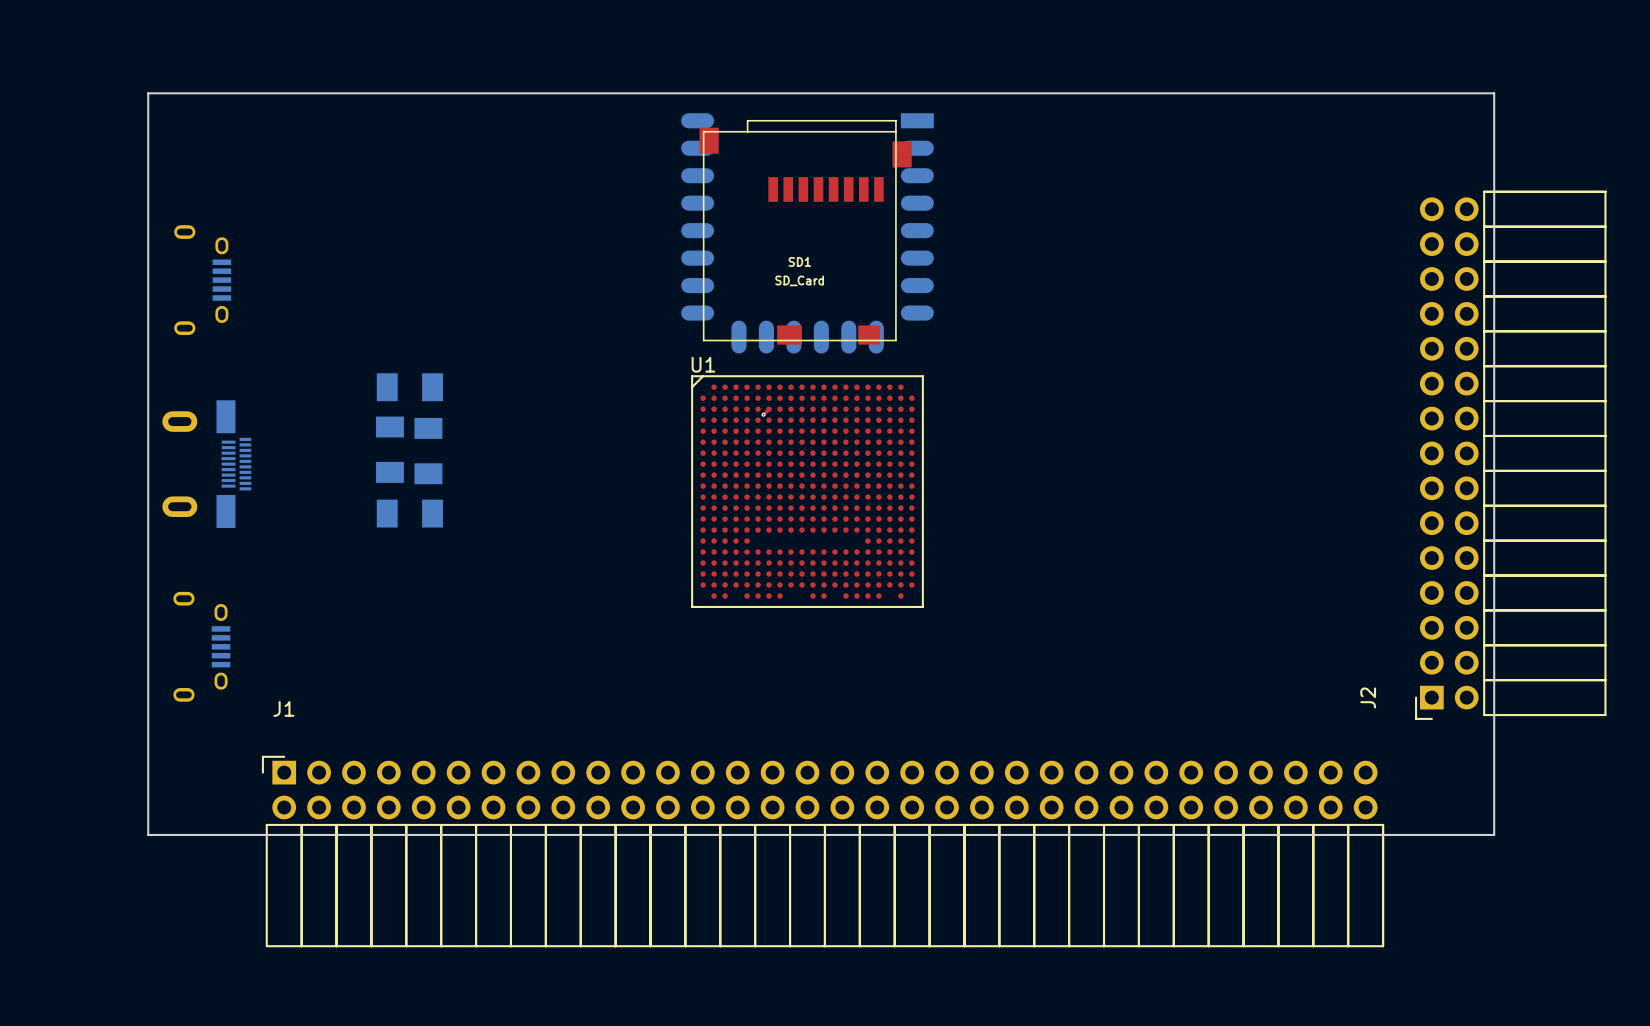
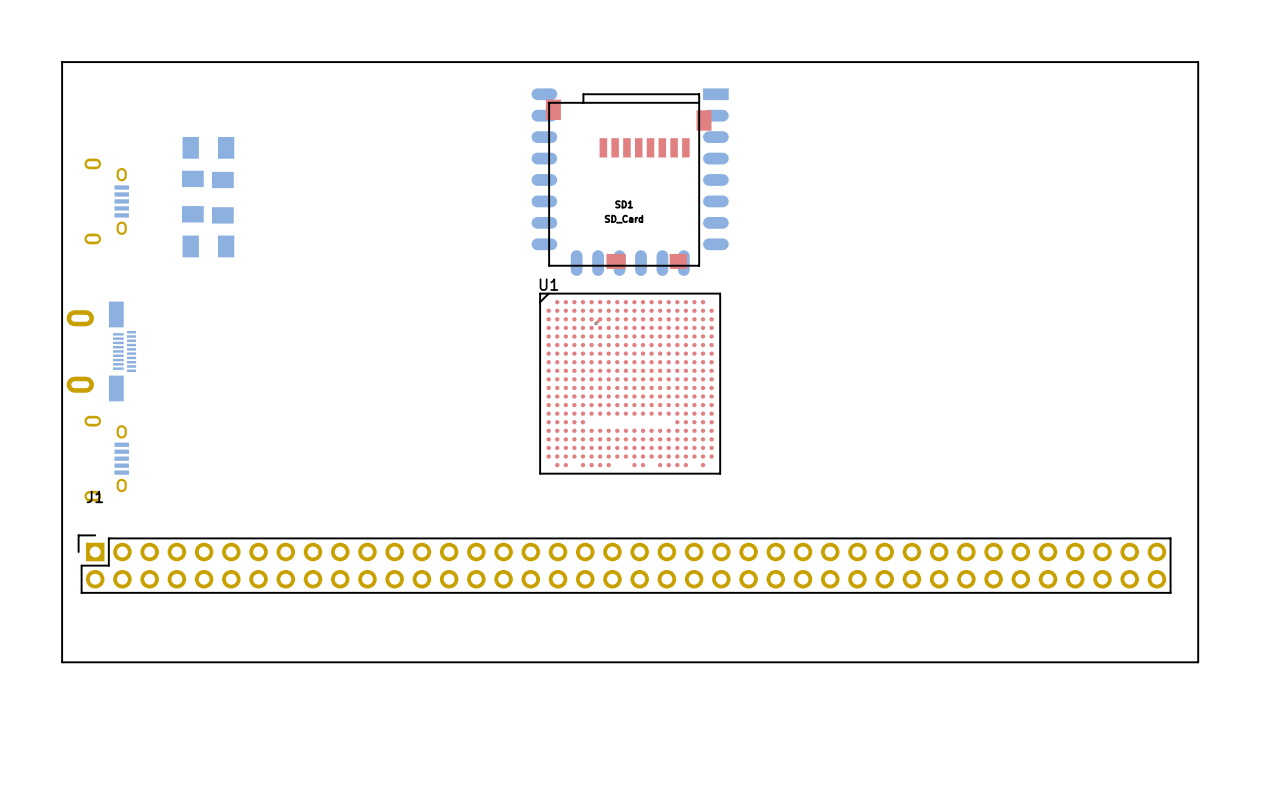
board edge: (148, 93) (148, 834) (1494, 834) (1494, 93) (148, 93) -> (62, 62) (62, 662) (1198, 662) (1198, 62) (62, 62)
part: none -> (208, 147)
part: none -> (192, 196)
part: none -> (222, 197)
part: none -> (106, 201)
part: (202, 280) -> none
part: none -> (208, 246)
part: (409, 387) -> none
part: (389, 449) -> none
part: (428, 451) -> none
J2: (1510, 455) -> none
part position: (206, 464) -> (101, 351)
part: (409, 513) -> none
part position: (201, 646) -> (106, 458)
J1 name position: J1 (283, 708) -> J1 (94, 496)
J1 footprint: [261, 755, 1385, 948] -> [77, 534, 1172, 594]

